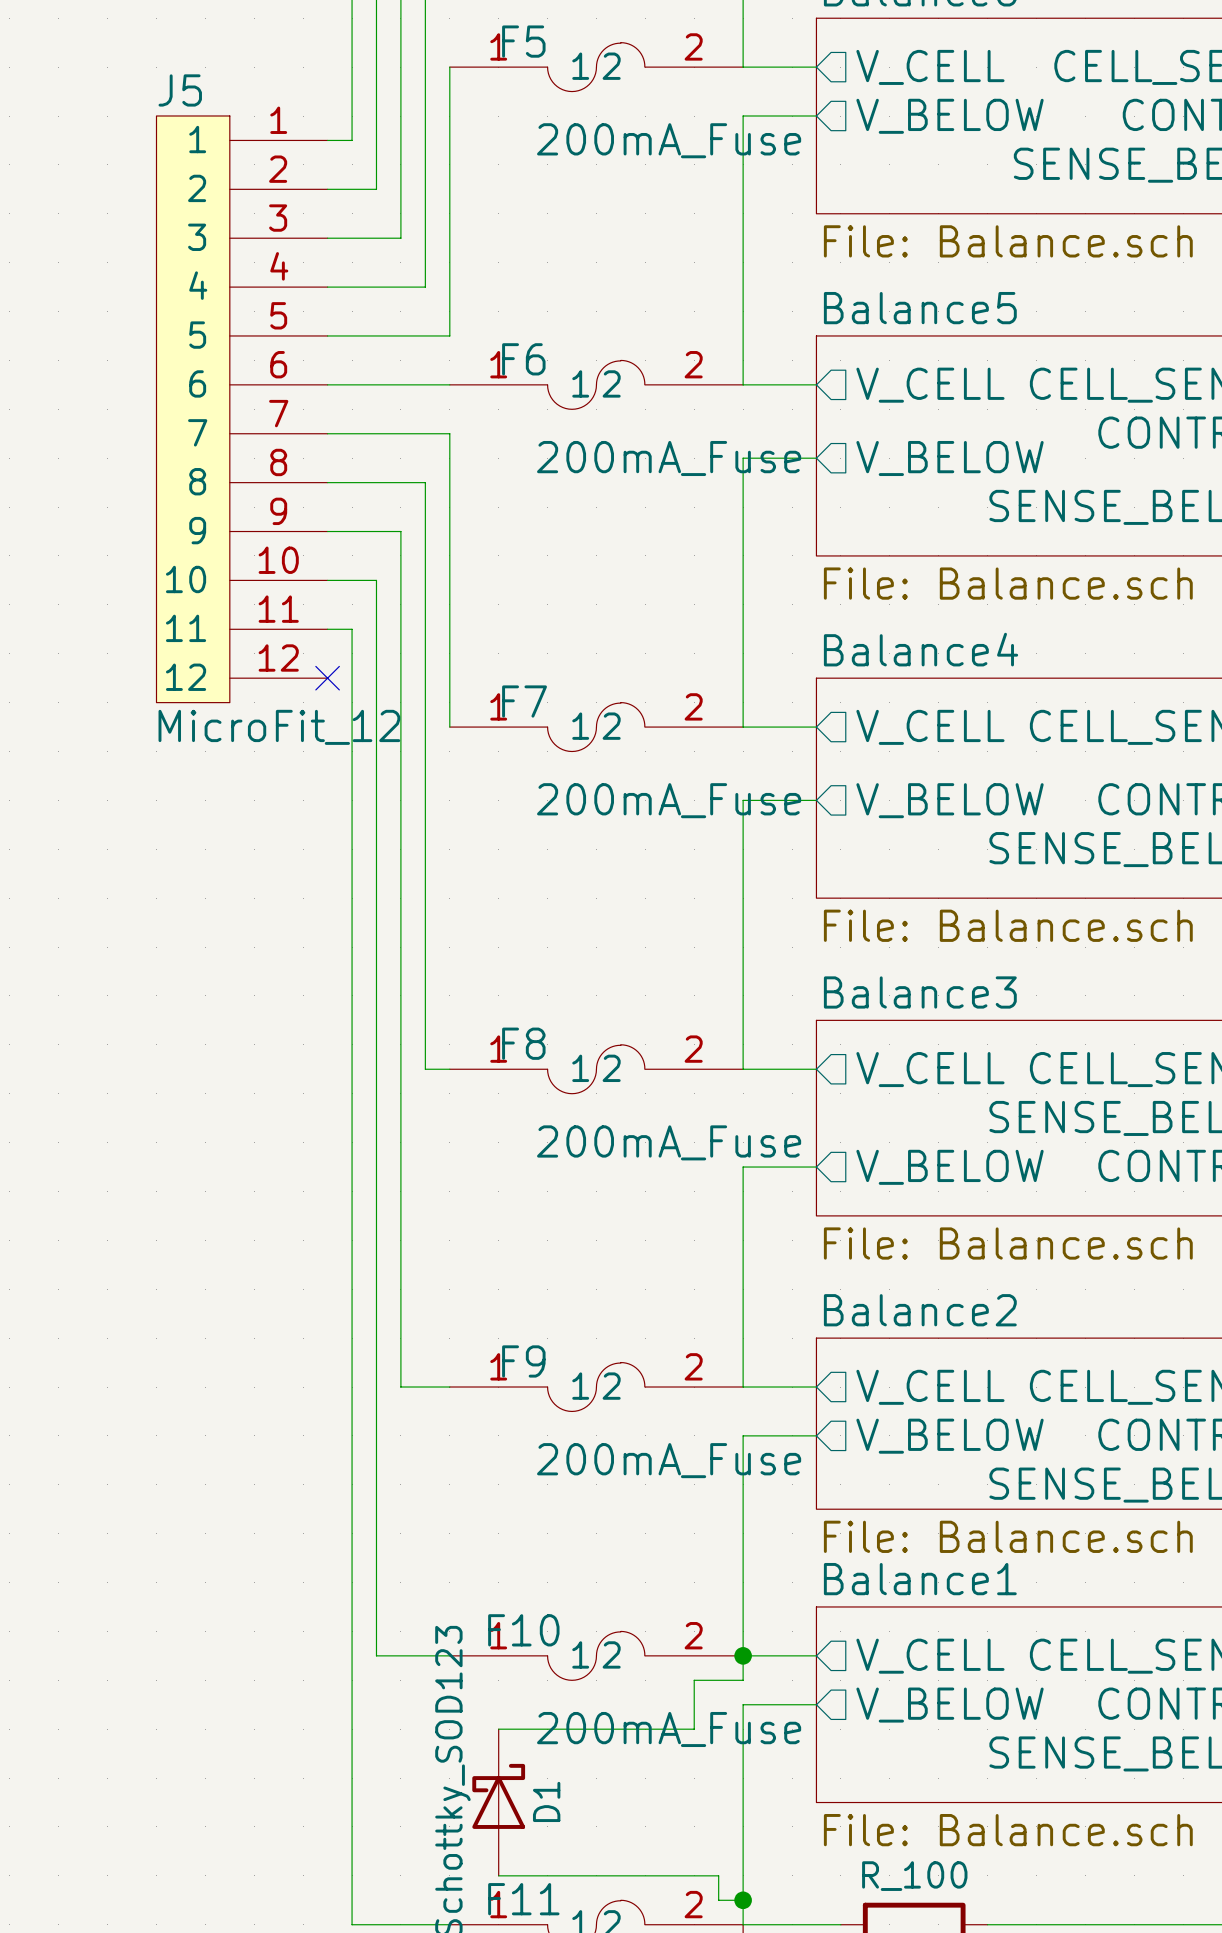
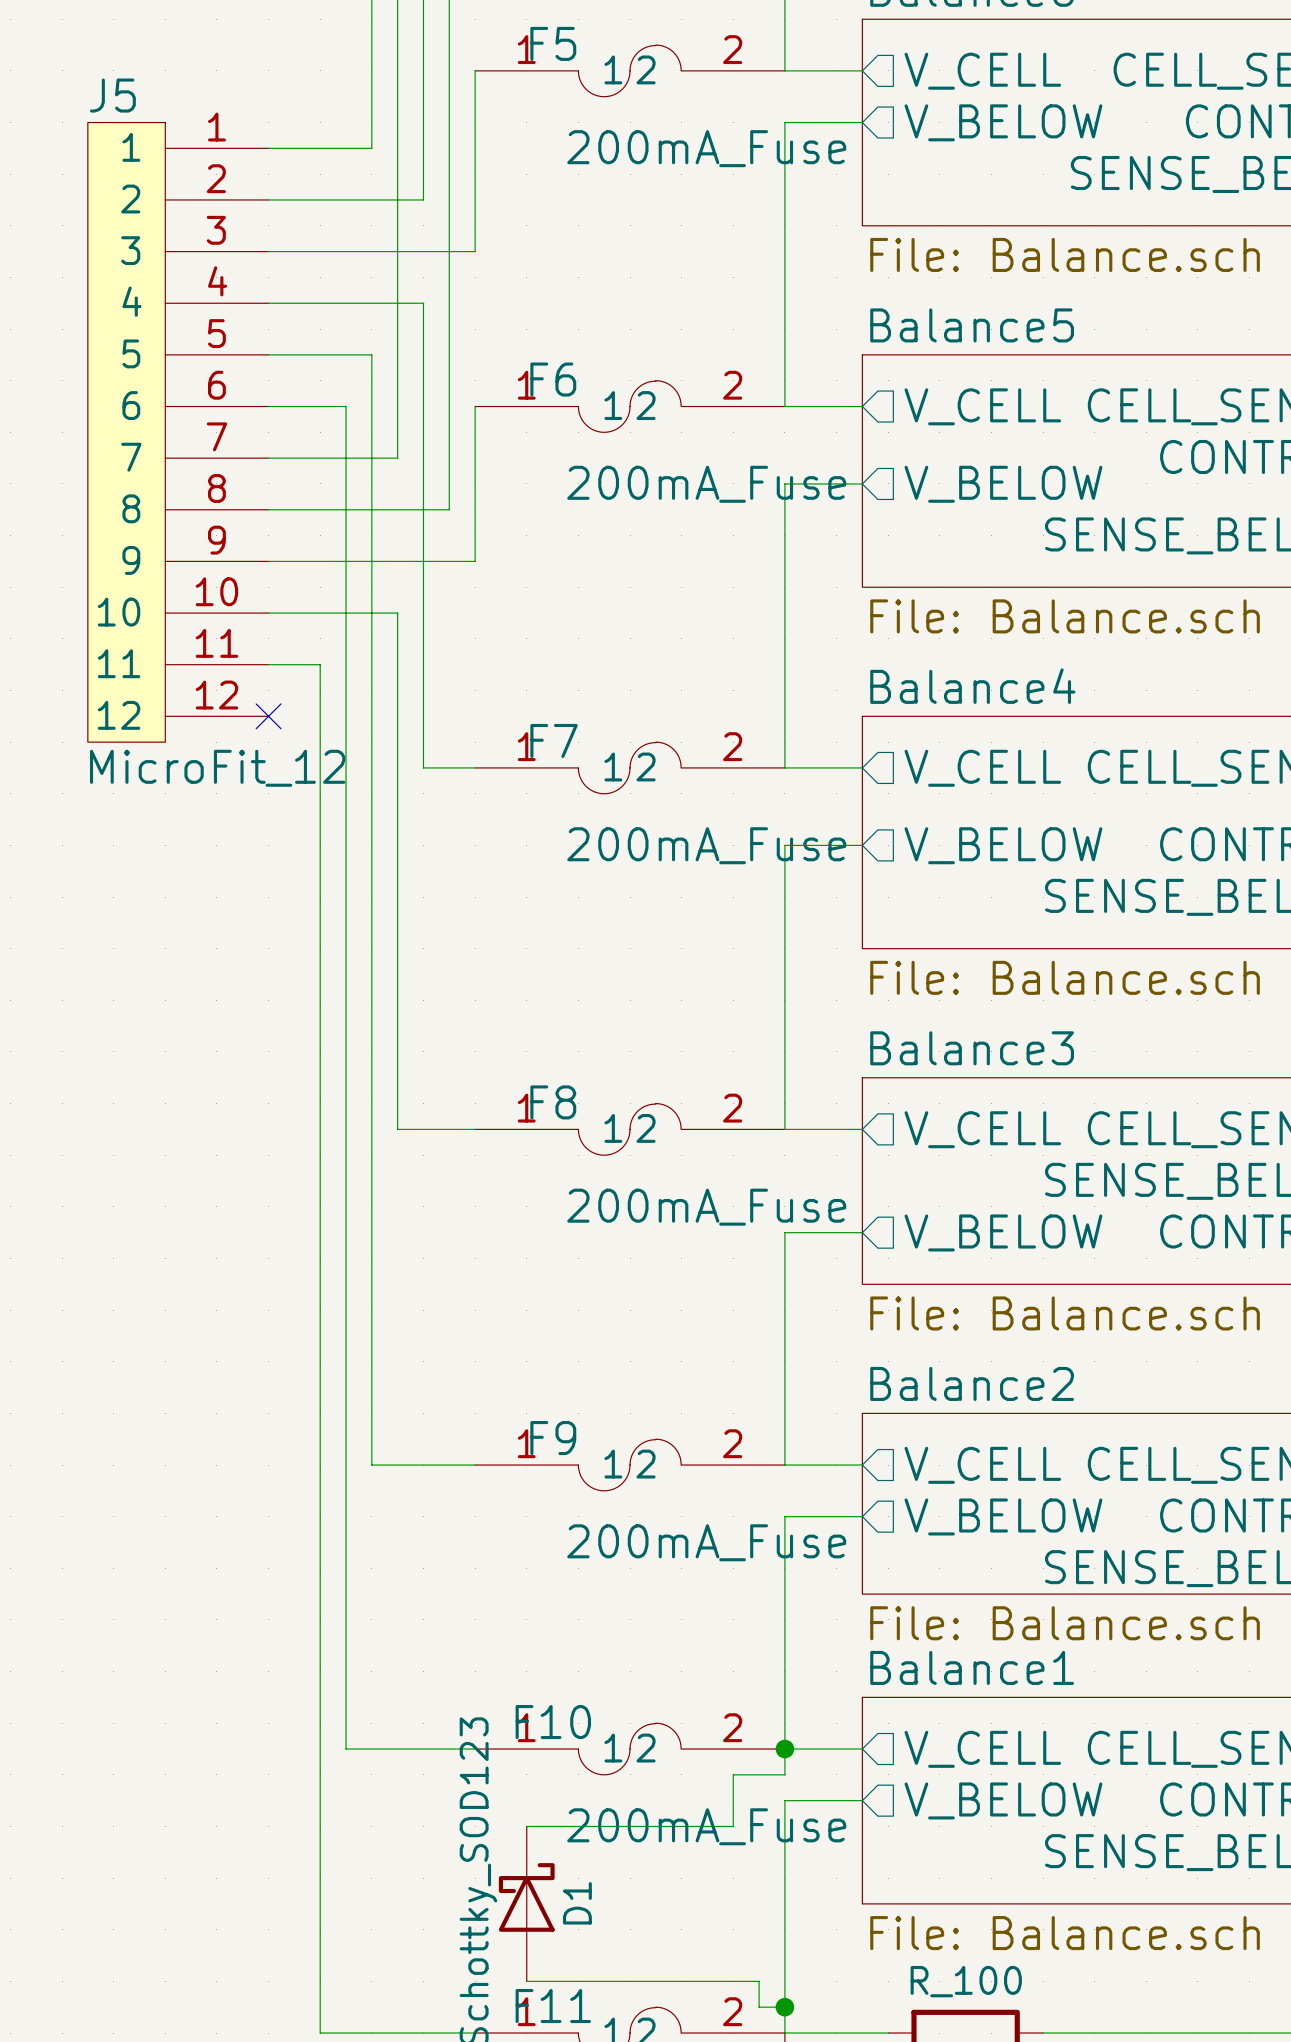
wire: (400, 189) (400, 238) -> (475, 251) (423, 251)
wire: none -> (423, 199) (397, 199) (397, 458)
wire: (449, 238) (449, 335) (352, 335) -> none
wire: (400, 287) (425, 287) -> (449, 509) (449, 303)
wire: none -> (423, 303) (423, 561) (475, 561)
wire: none -> (268, 406) (346, 406) (346, 1749) (397, 1749)
wire: (327, 384) (449, 384) -> none
J5 position: (242, 409) -> (178, 432)
wire: (376, 433) (449, 433) -> (475, 406) (475, 458)
wire: (425, 482) (425, 1069) -> none
wire: (449, 531) (449, 727) -> (423, 767) (475, 767)
wire: none -> (268, 664) (320, 664) (320, 2033) (371, 2033)
wire: (327, 629) (352, 629) -> (371, 354) (371, 664)
no-connect mark position: (327, 678) -> (268, 716)
wire: (400, 727) (400, 1387) -> none
wire: (376, 1069) (376, 1655) -> (397, 1129) (449, 1129)
wire: (352, 1387) (352, 1924) -> (371, 1465) (423, 1465)

